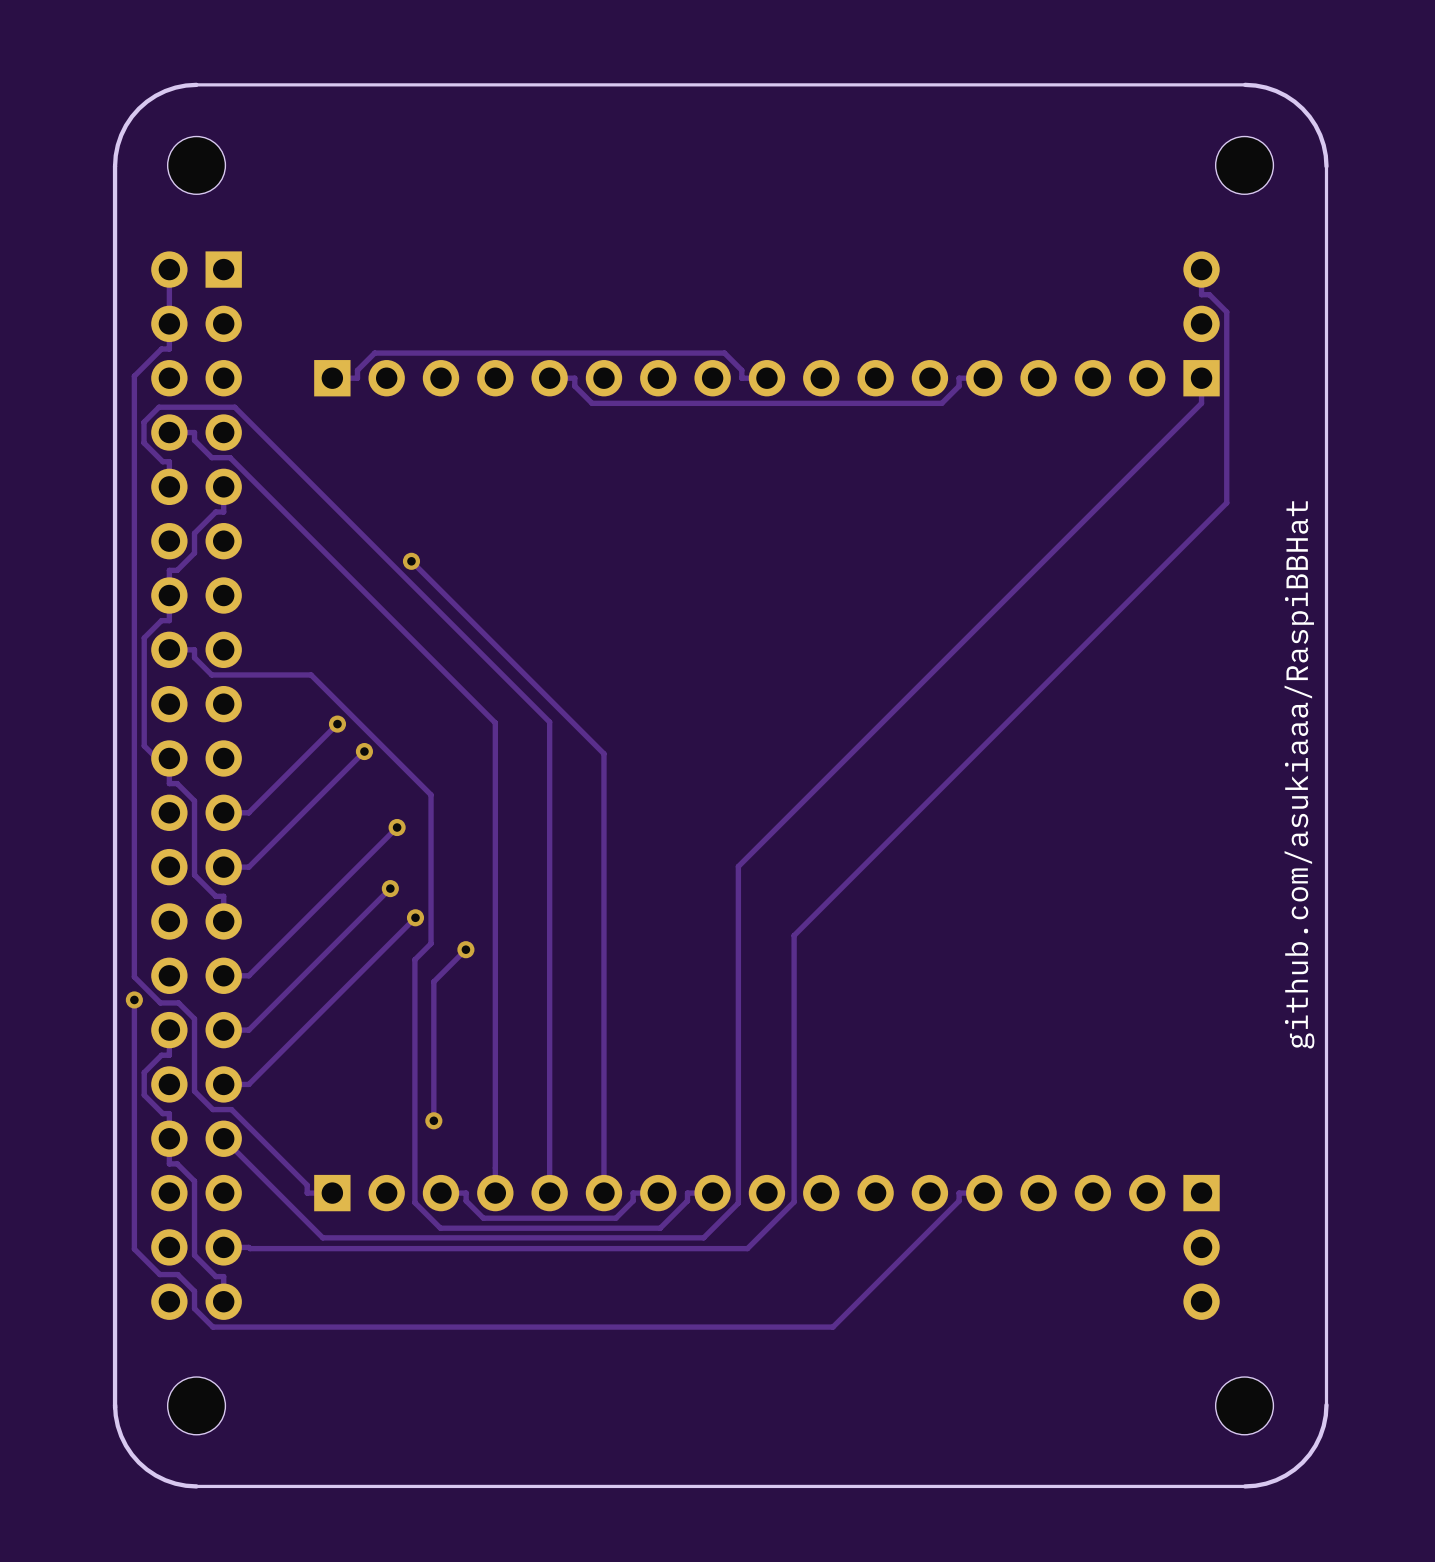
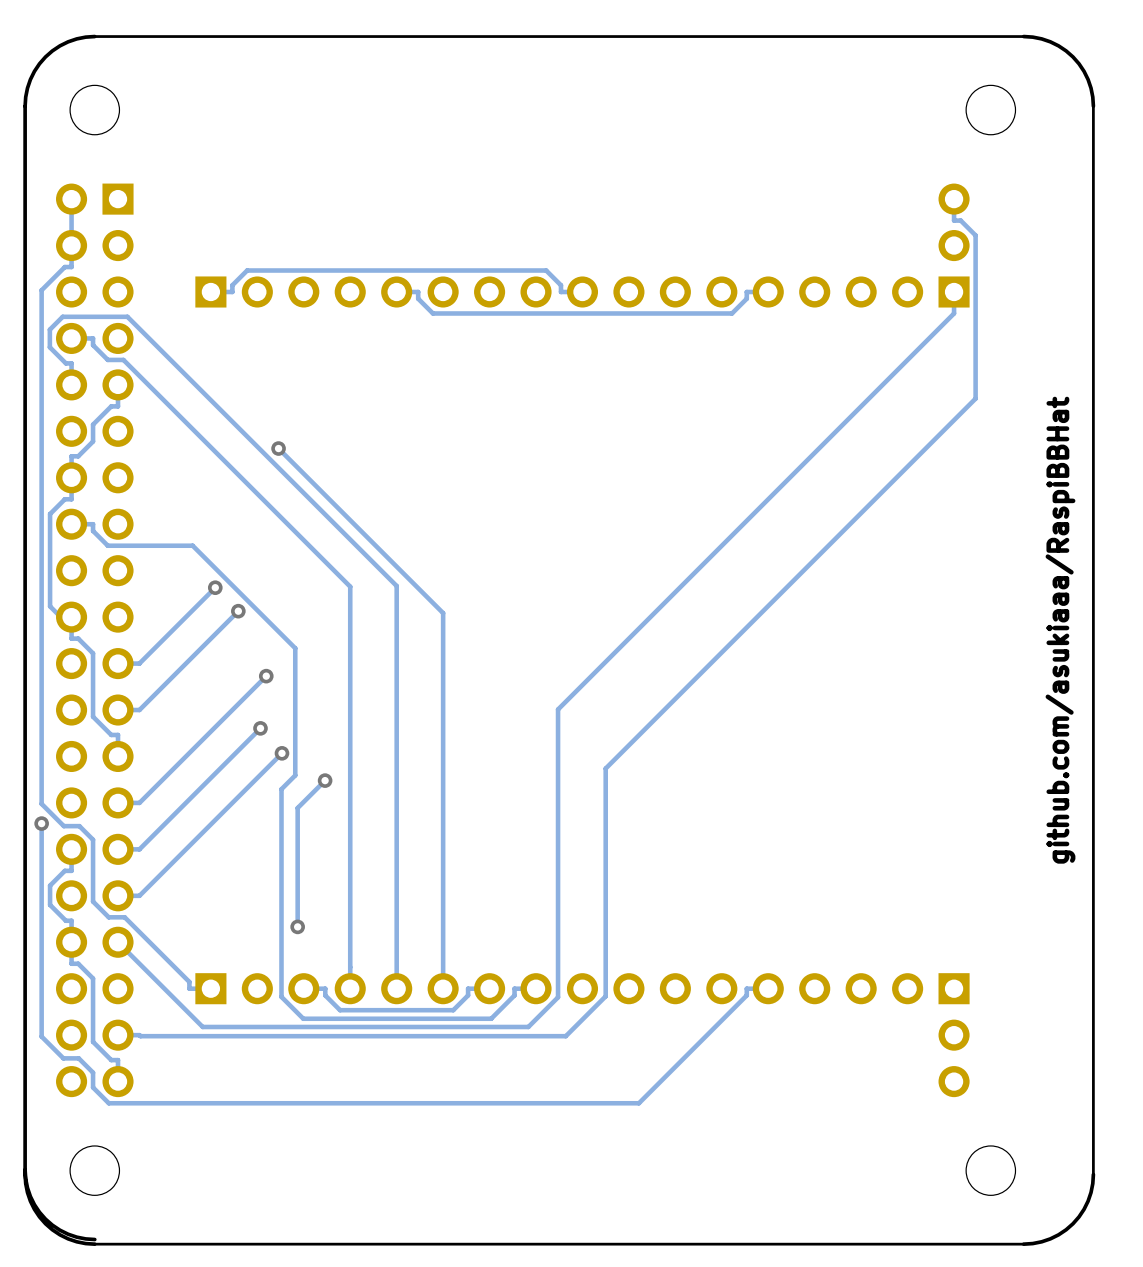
board edge: (1243, 84) (185, 85) (155, 95) (131, 116) (117, 145) (115, 166) -> (25, 1172) (30, 1201) (45, 1223) (68, 1238) (94, 1244) (1023, 1244) (1050, 1238) (1072, 1223) (1088, 1201) (1093, 1174) (1093, 106) (1088, 79) (1072, 56) (1050, 41) (1032, 37) (94, 36) (68, 41) (45, 56) (30, 79) (25, 97) (25, 110)
board edge: (1245, 84) (1276, 91) (1302, 108) (1320, 135) (1326, 166) (1326, 1406) -> none
text position: github.com/asukiaaa/RaspiBBHat (1299, 774) -> github.com/asukiaaa/RaspiBBHat (1060, 630)
board edge: (1326, 1404) (1320, 1436) (1309, 1454) (1285, 1475) (1255, 1485) (195, 1486) -> none

